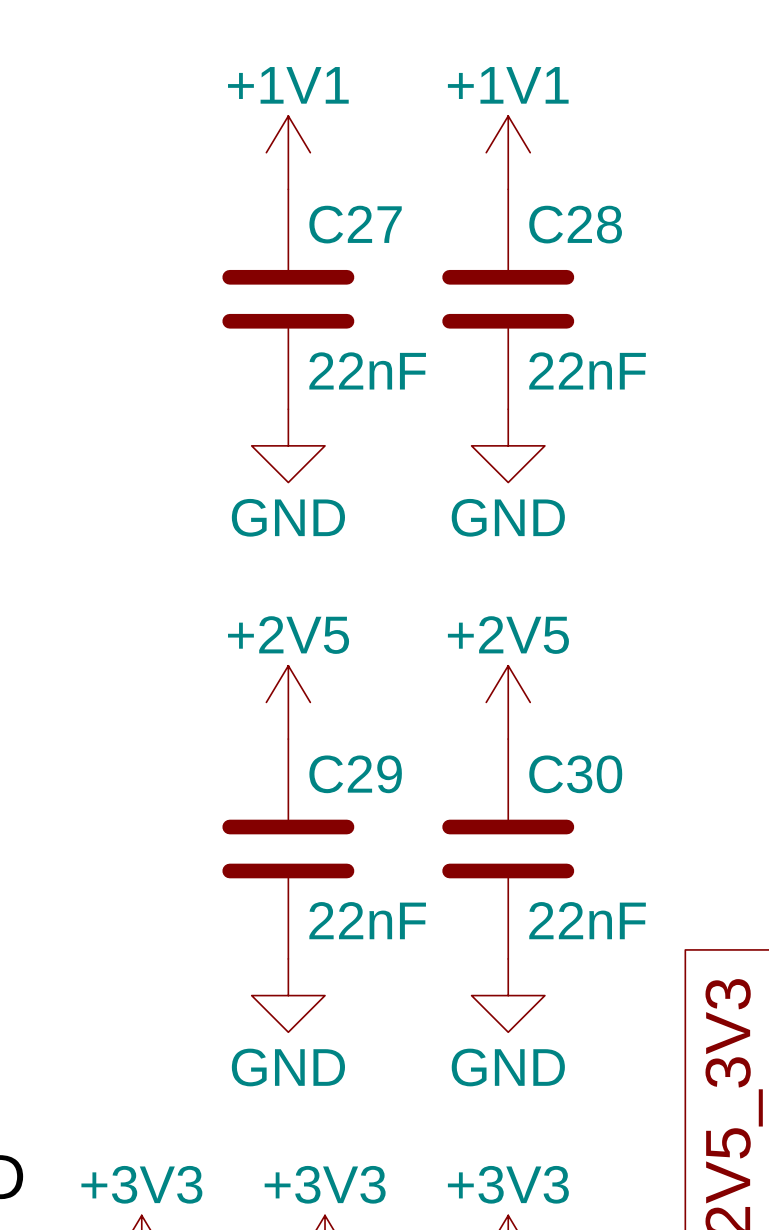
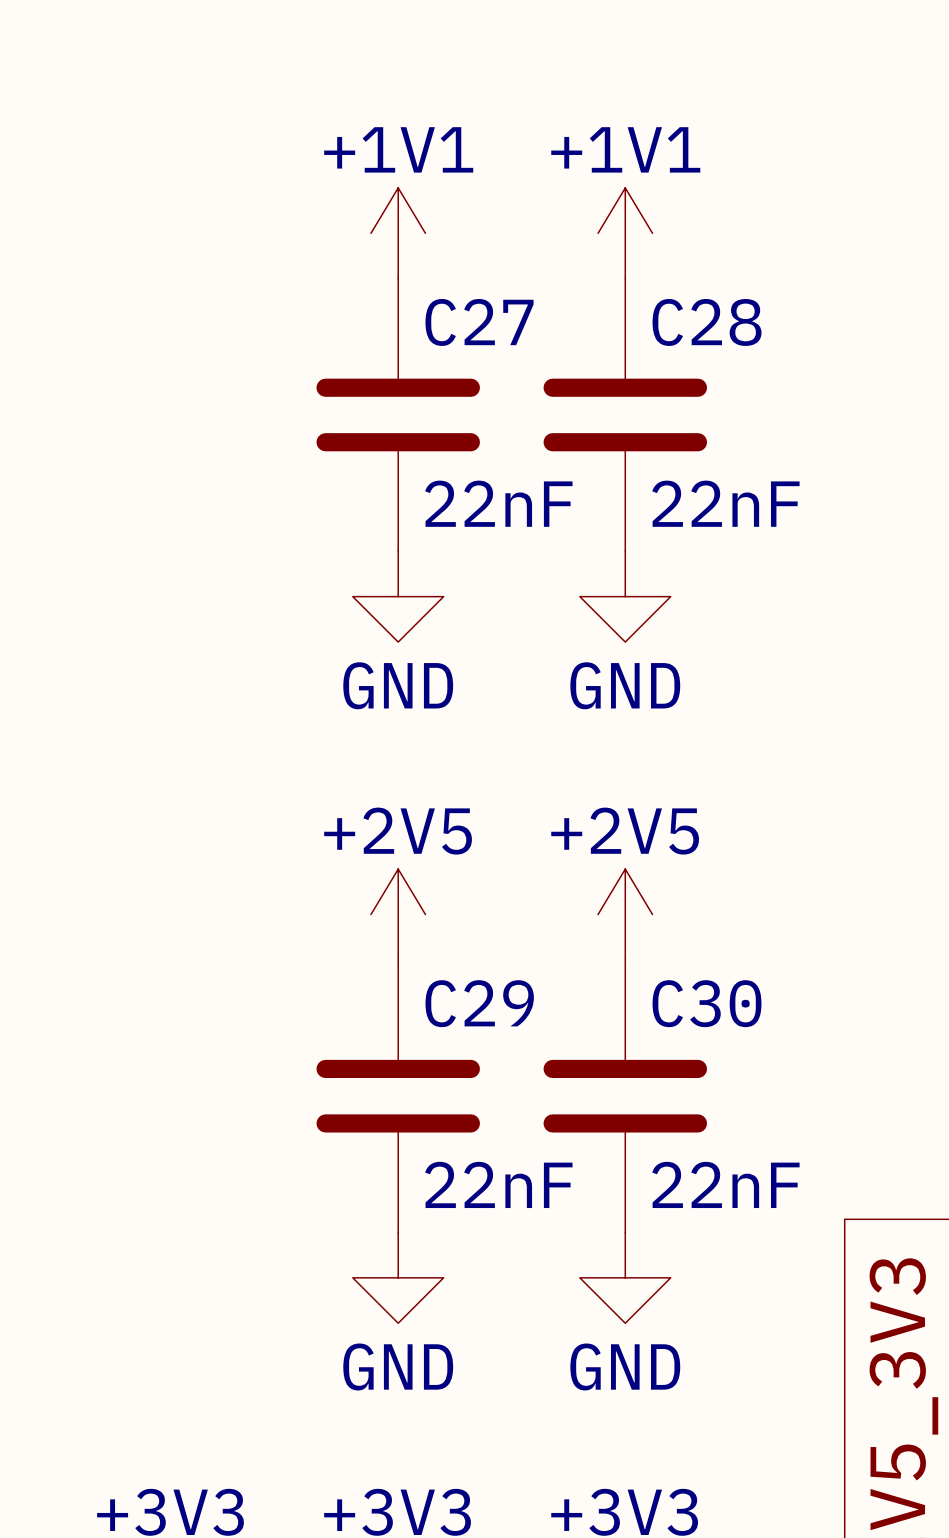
power symbol position: +1V1 (288, 152) -> +1V1 (398, 233)
C27 position: (288, 299) -> (398, 414)
power symbol position: GND (288, 445) -> GND (398, 596)
power symbol position: +2V5 (288, 702) -> +2V5 (398, 914)
C29 position: (288, 849) -> (398, 1096)
power symbol position: GND (288, 995) -> GND (398, 1277)

